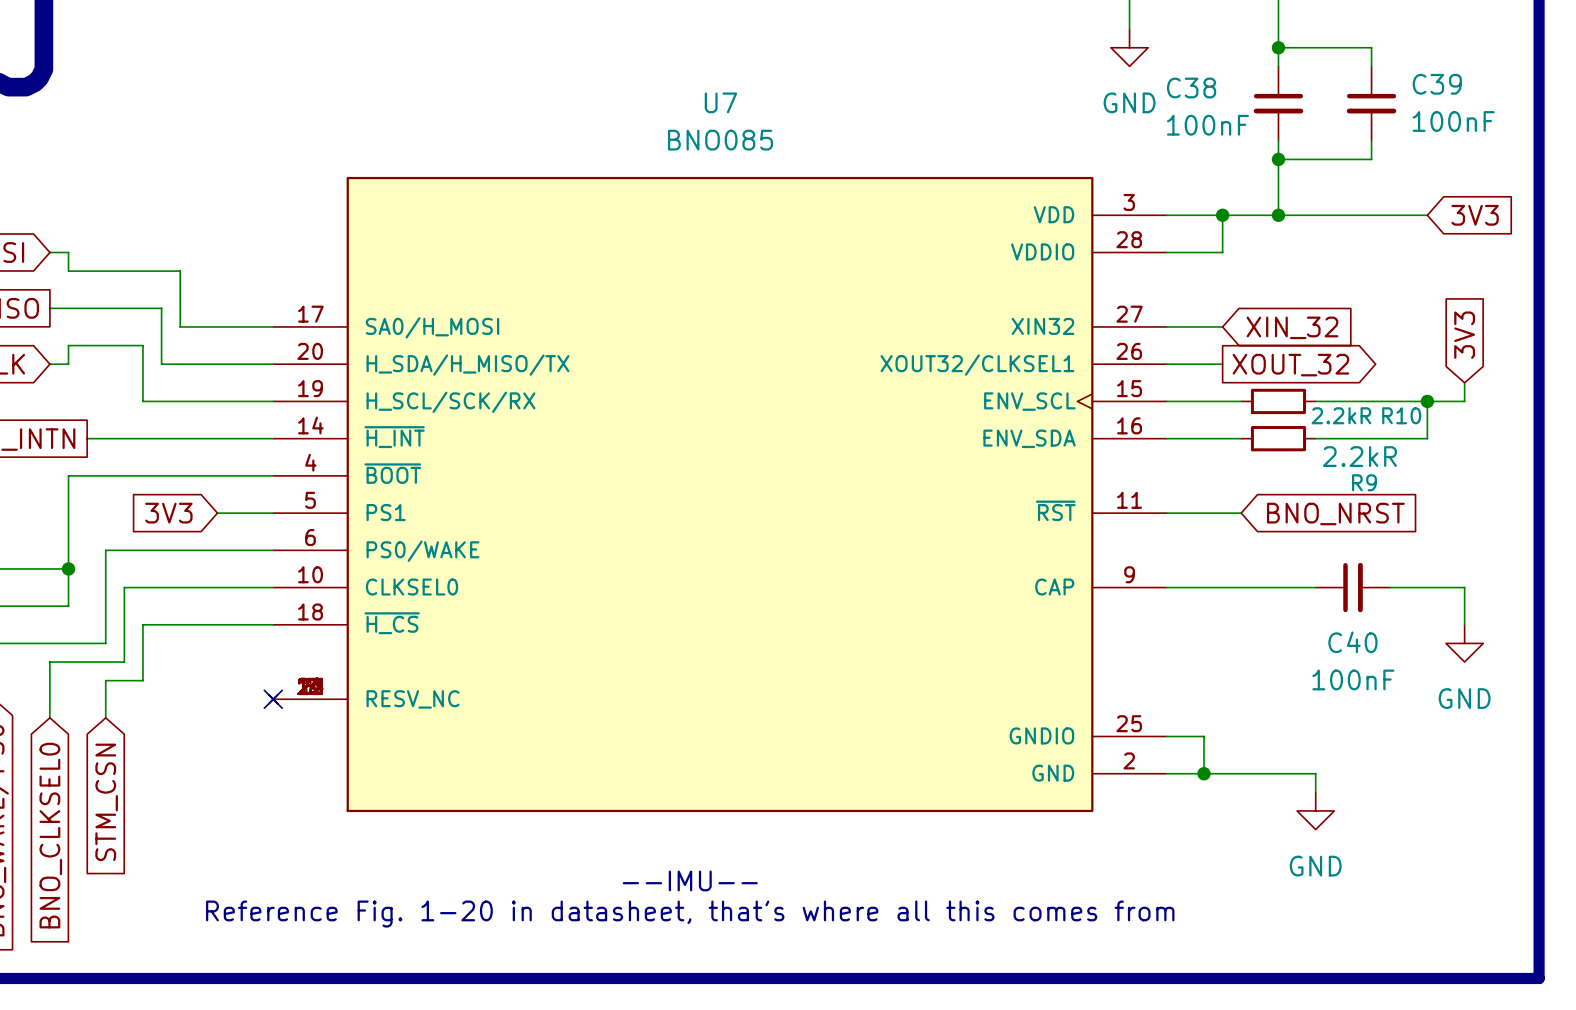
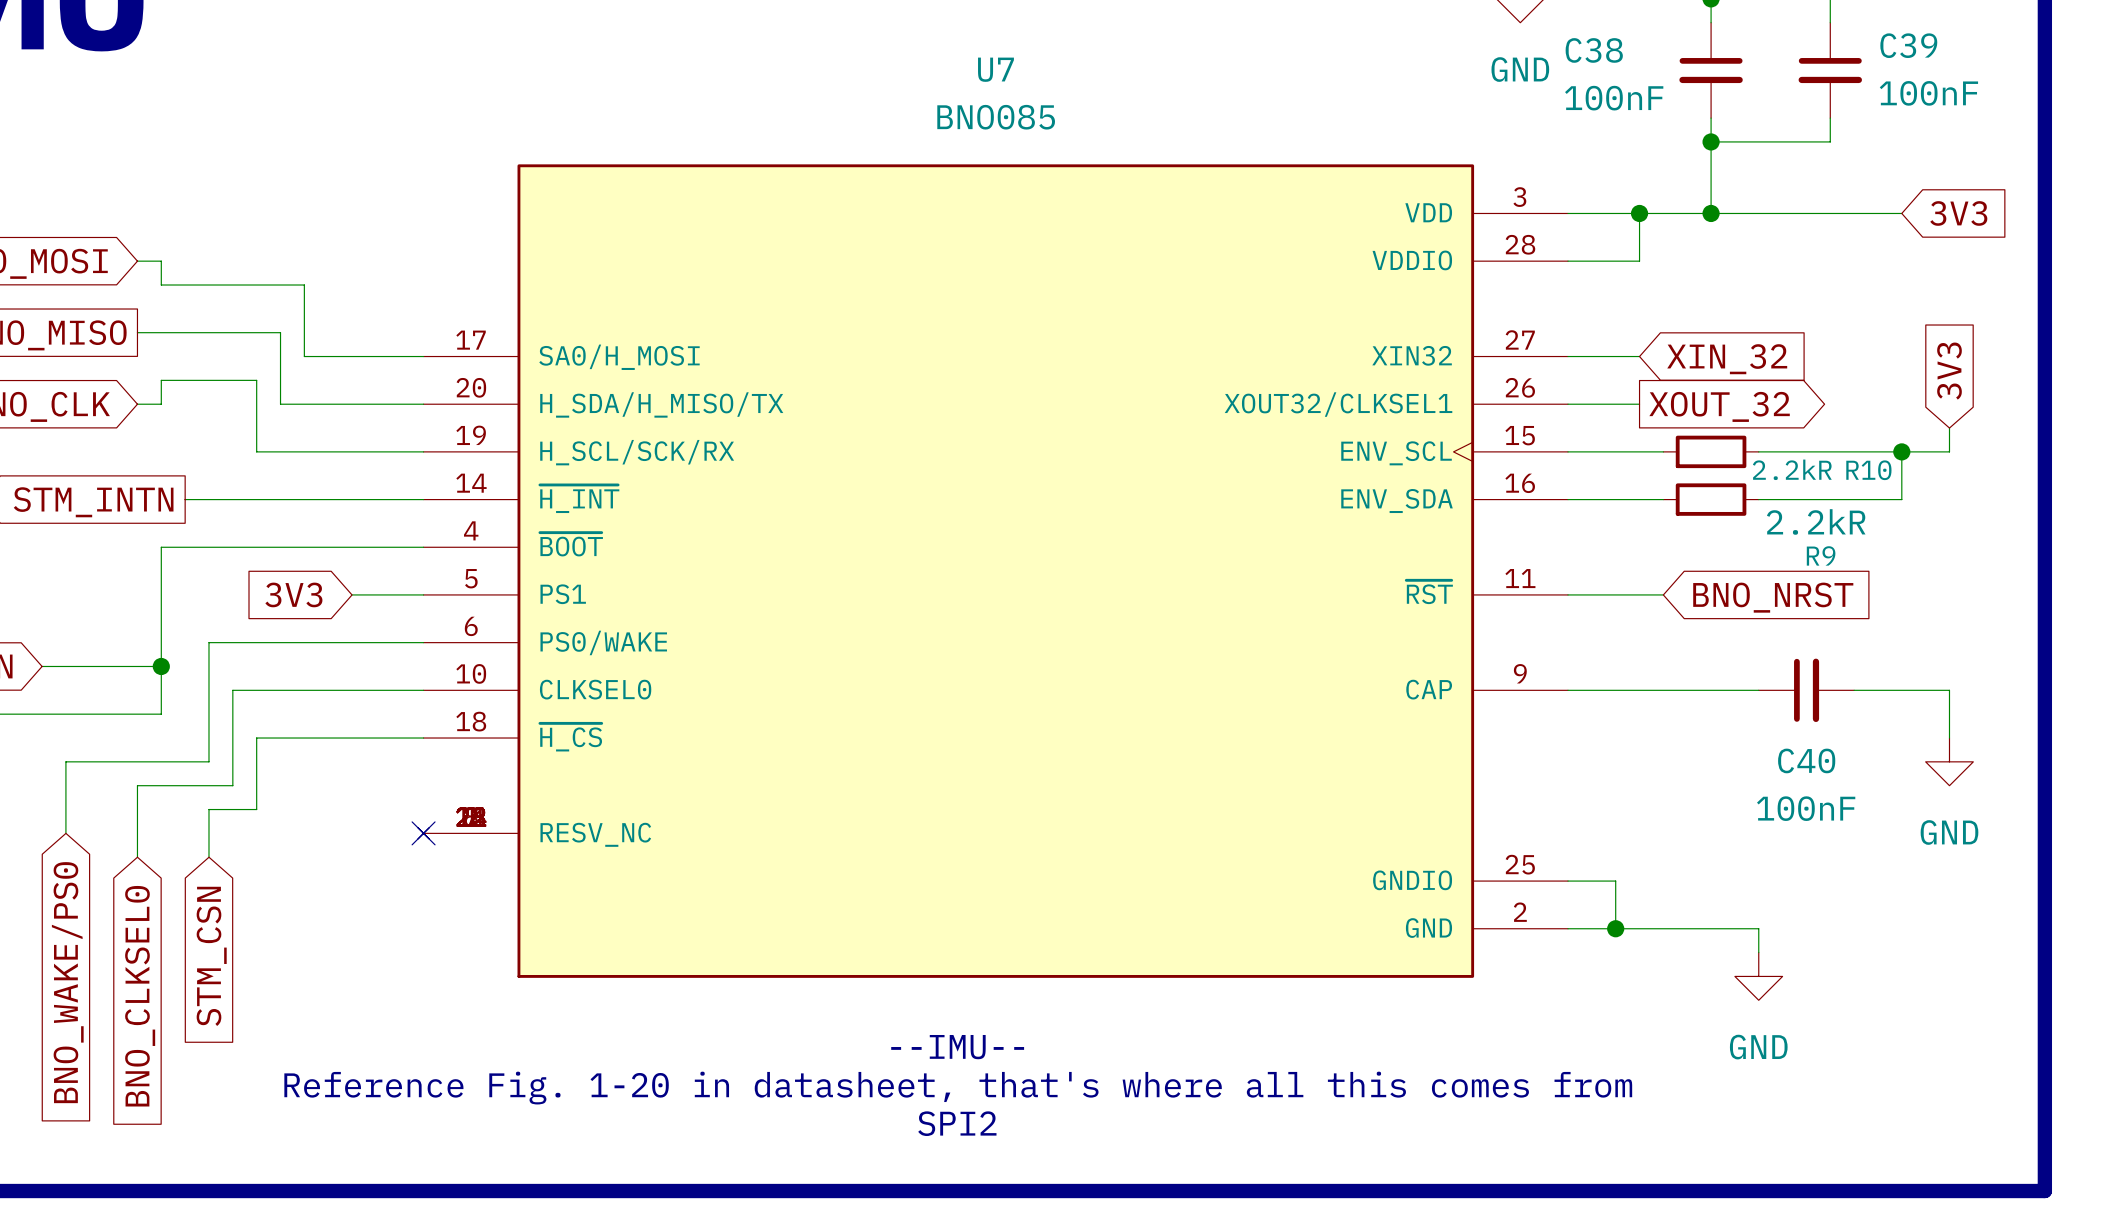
text position: --IMU-- (690, 880) -> --IMU-- (957, 1047)
text position: Reference Fig. 1-20 in datasheet, that's where all this comes from (690, 914) -> Reference Fig. 1-20 in datasheet, that's where all this comes from (958, 1088)
text: none -> SPI2 (957, 1123)

